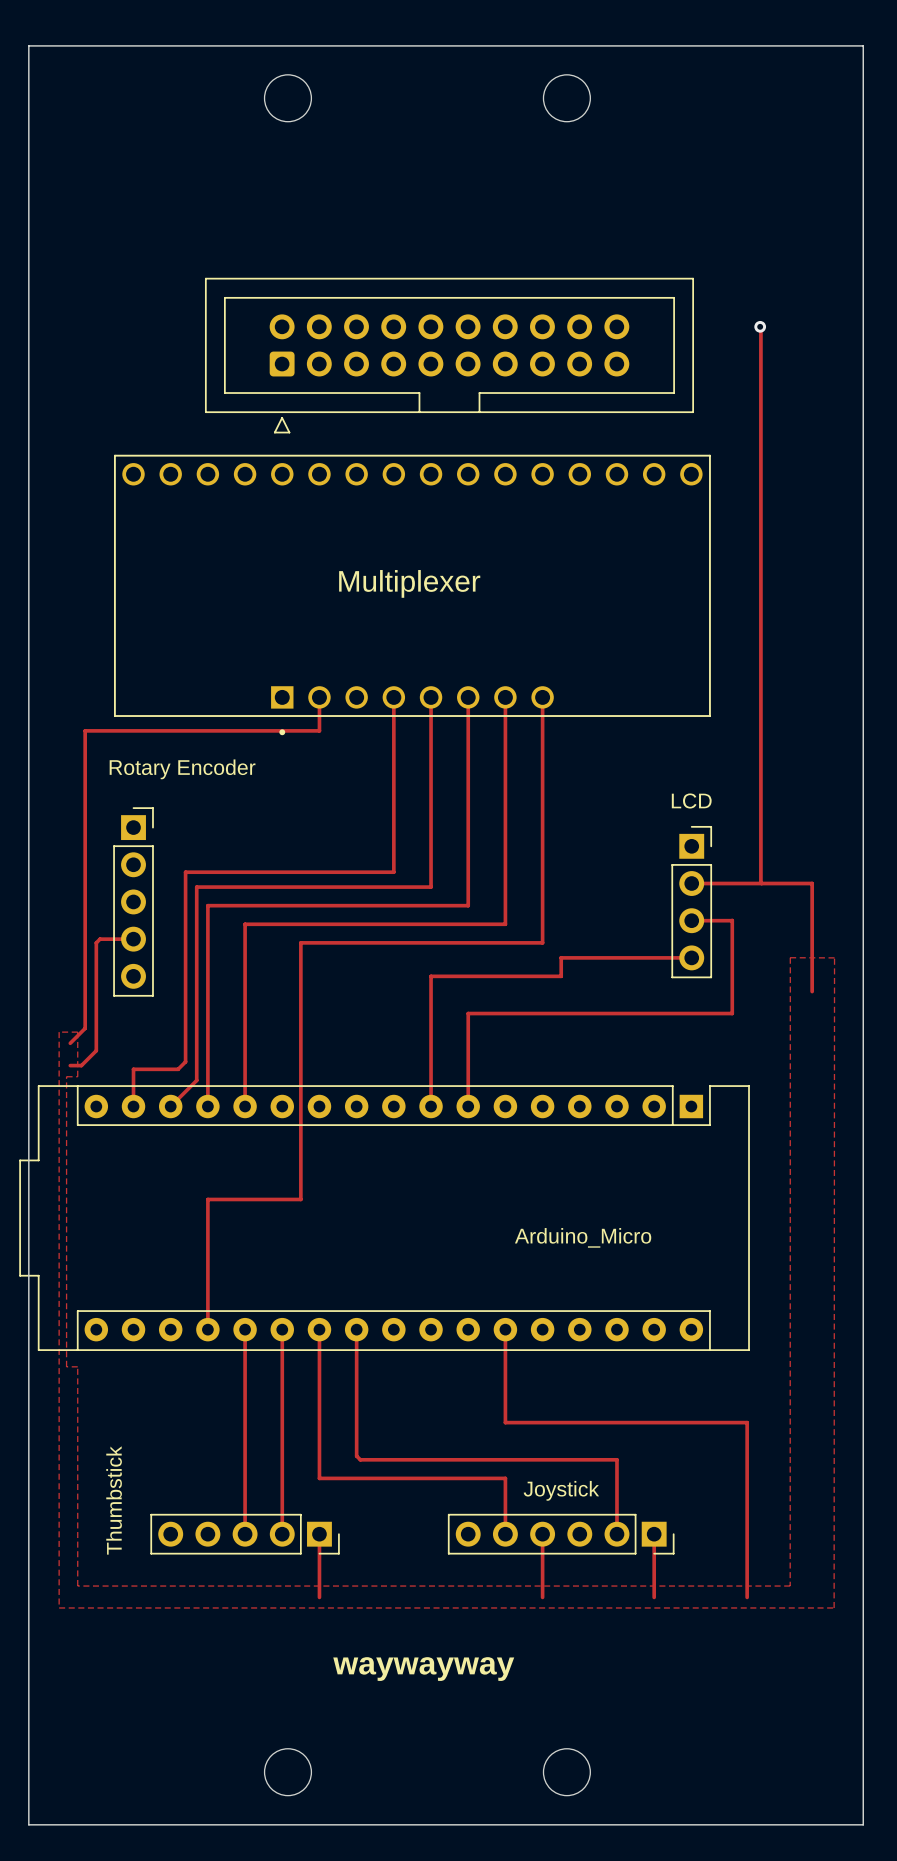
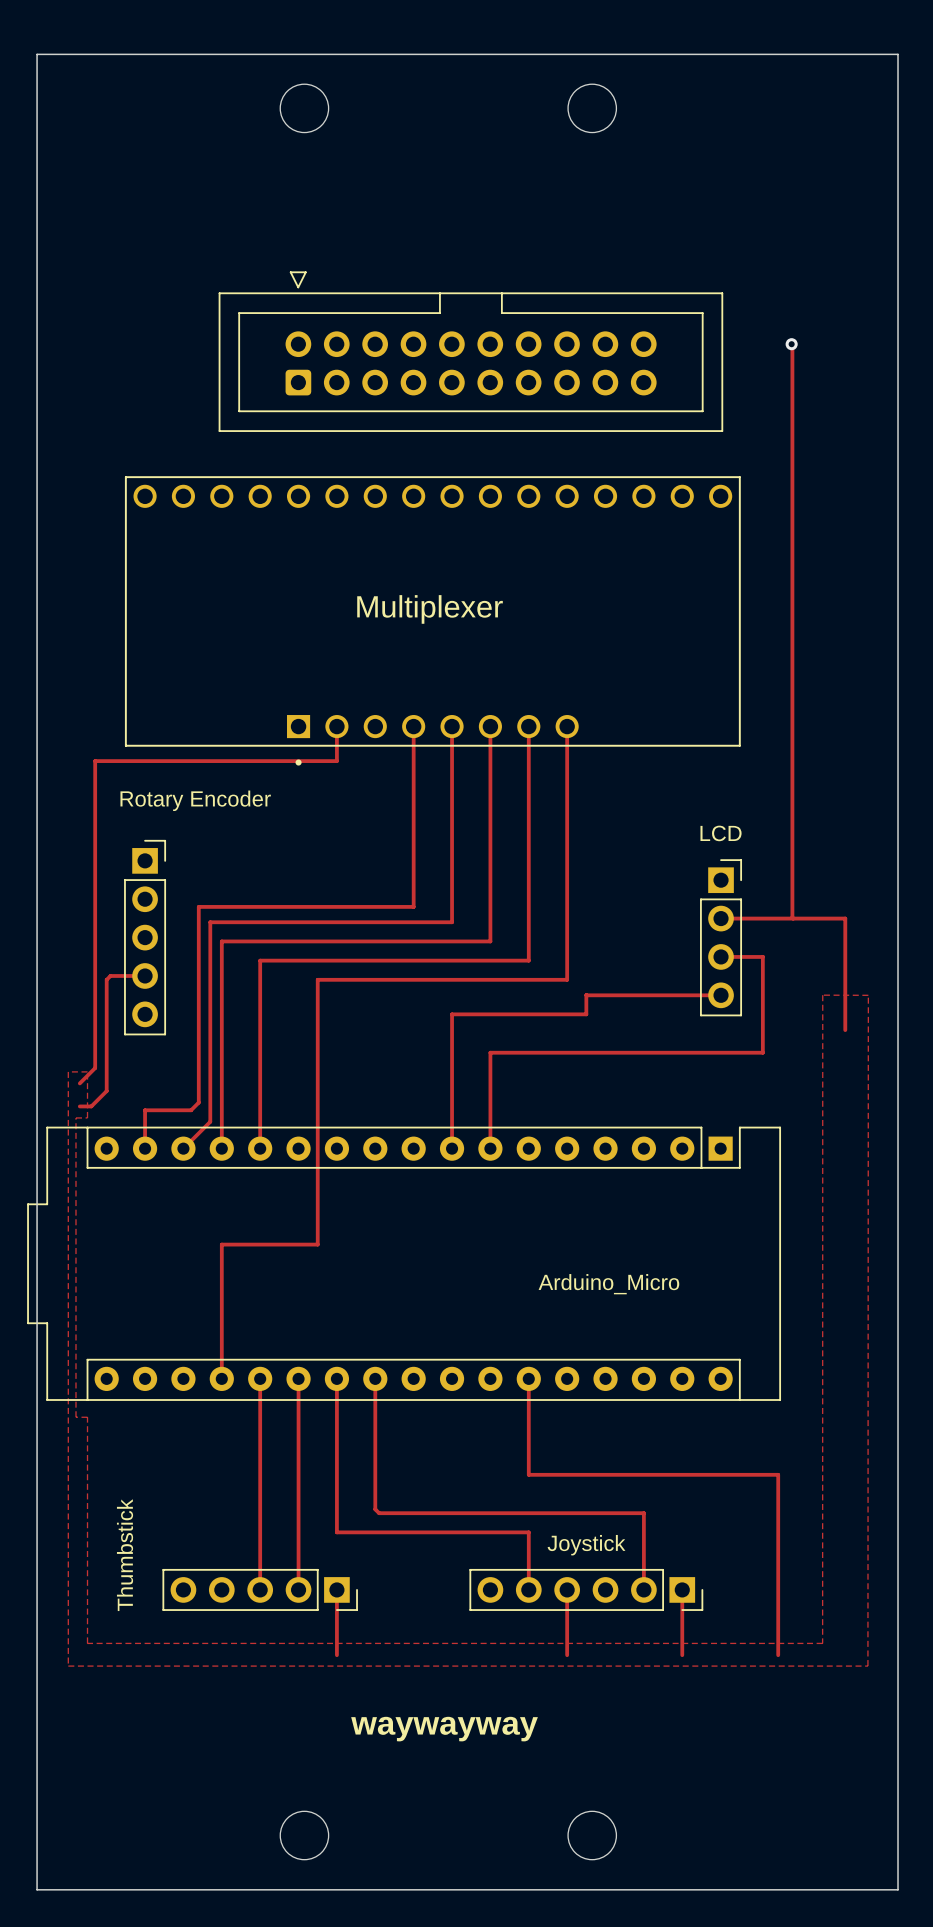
part: none -> (470, 351)
part: (449, 355) -> none

